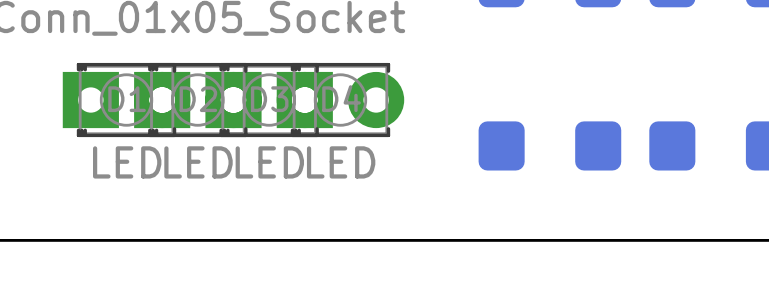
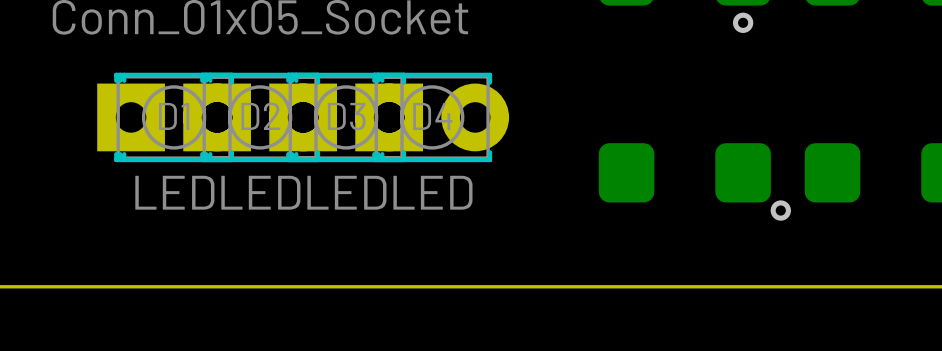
via: none -> (743, 22)
via: none -> (780, 210)

